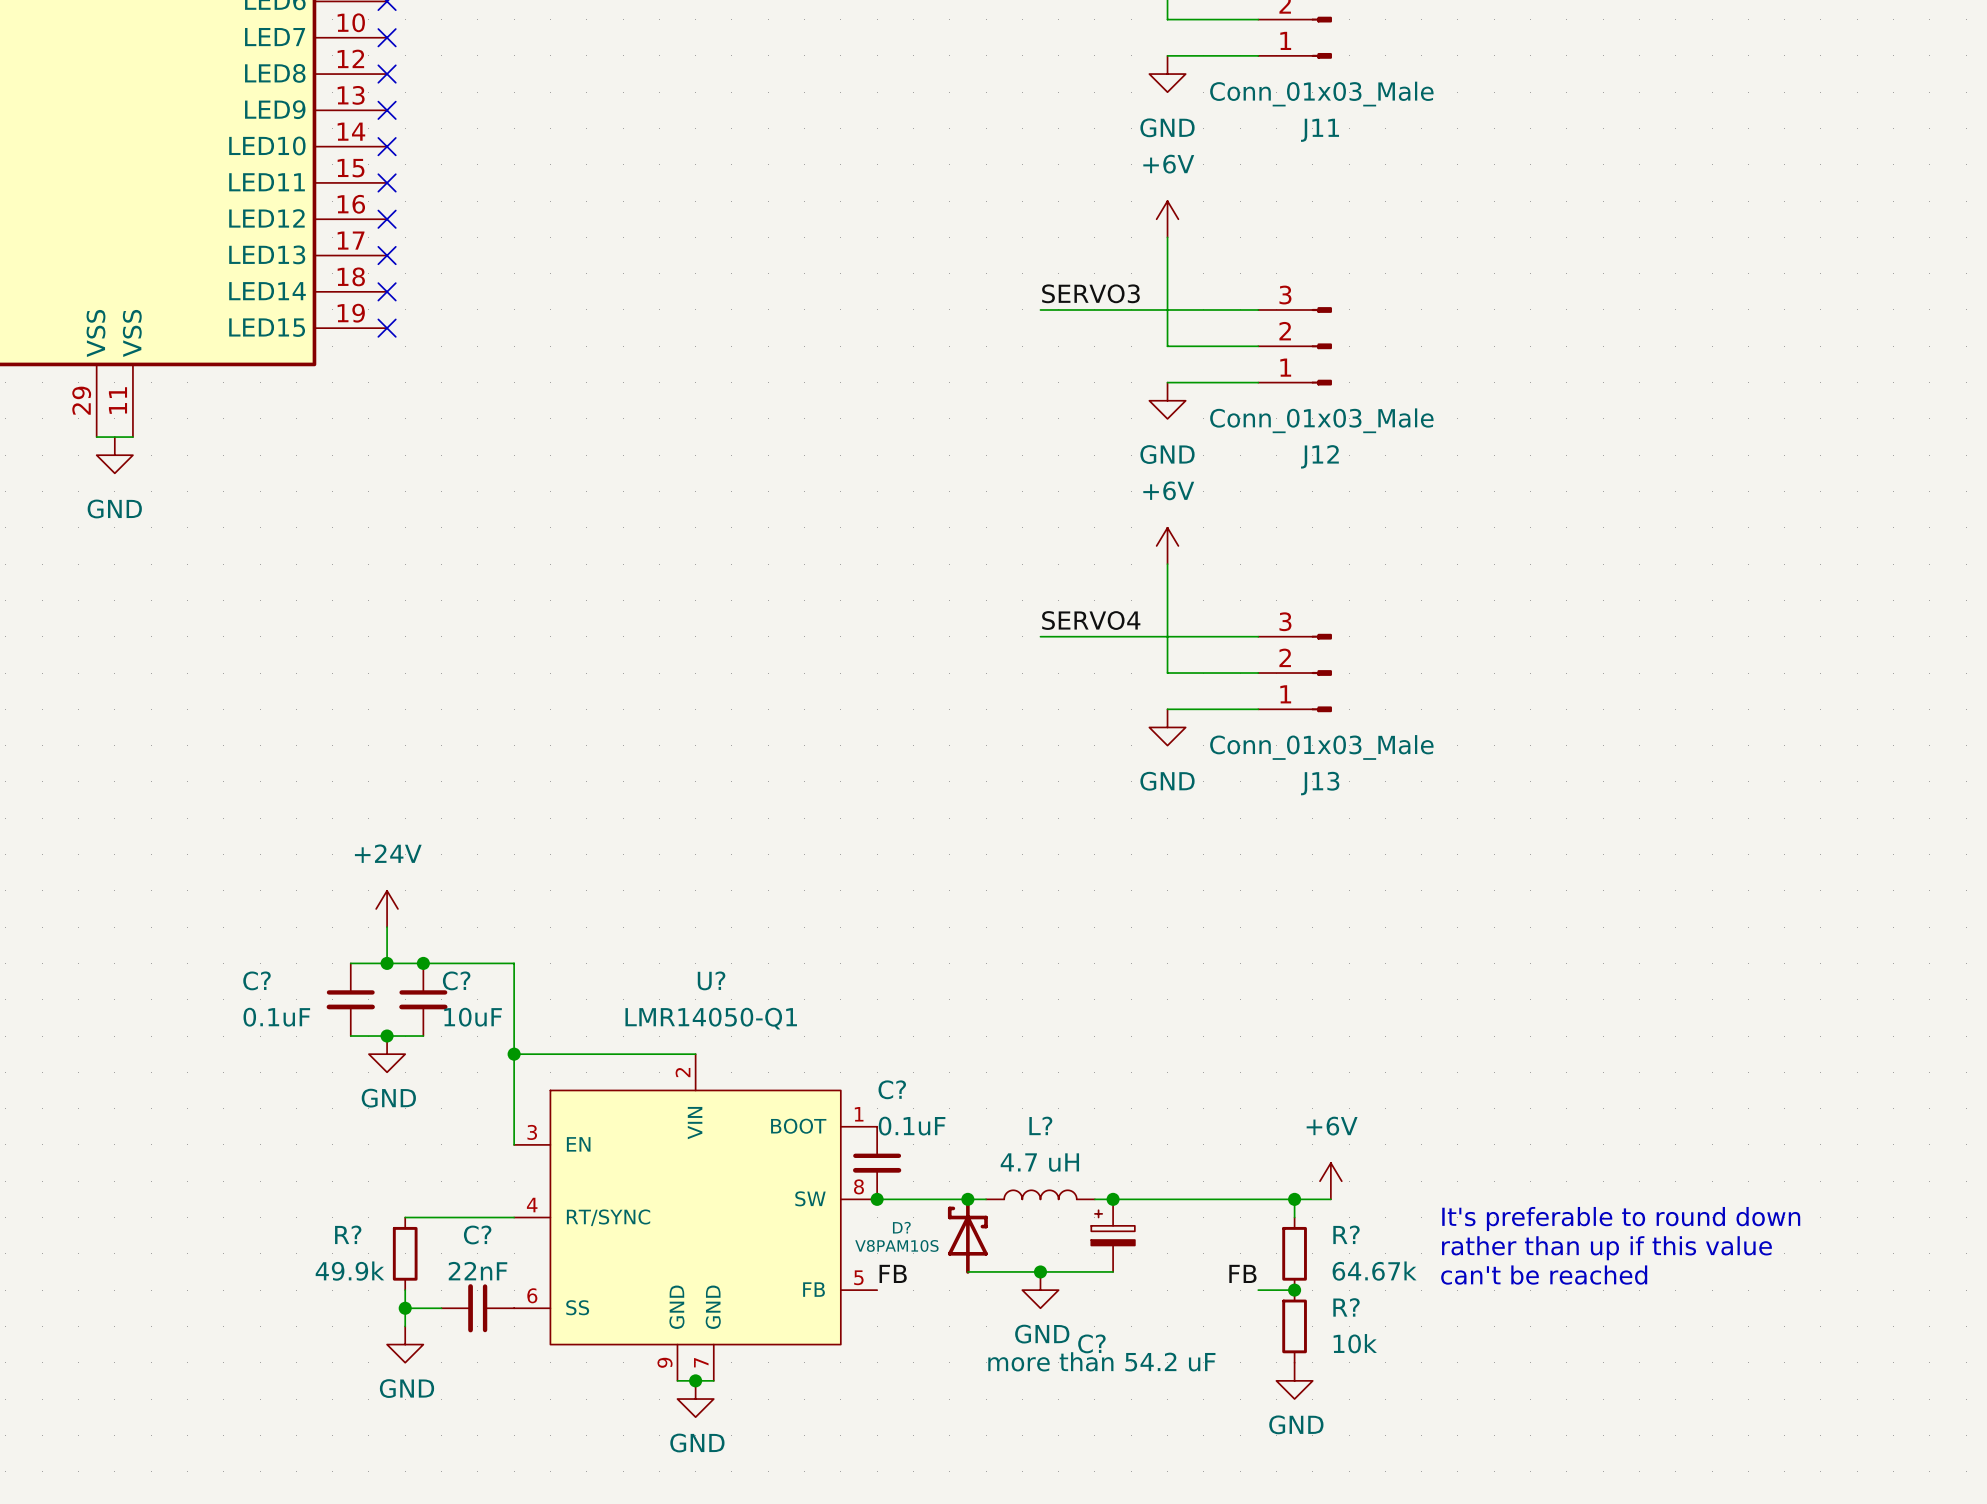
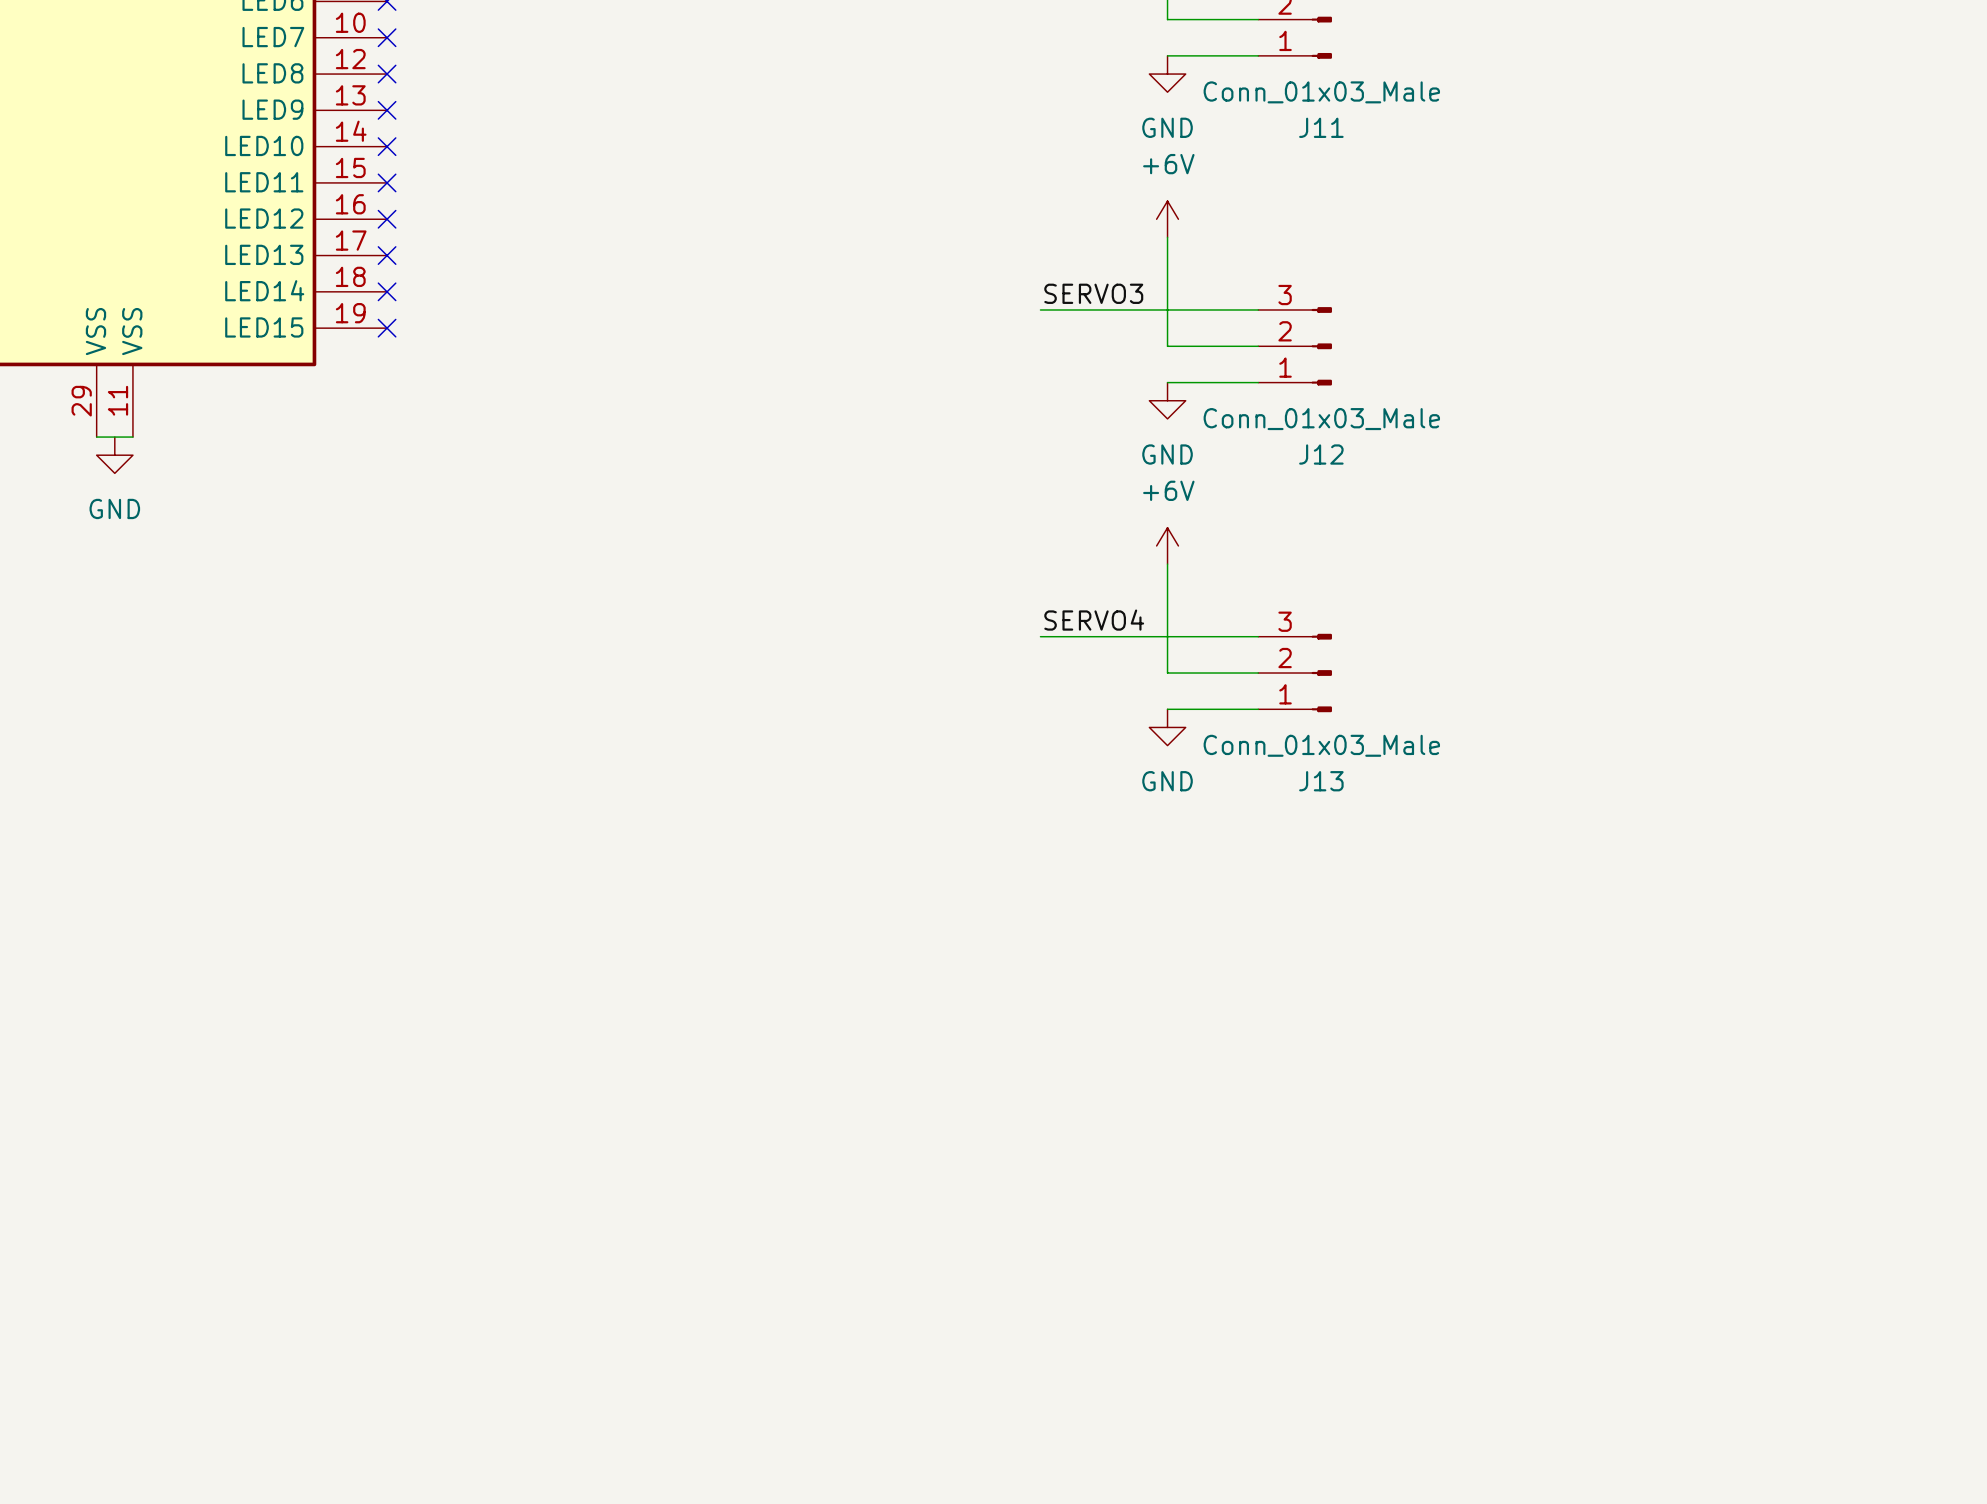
power symbol: +24V (387, 908) -> none
wire: (387, 927) (387, 963) -> none
wire: (350, 963) (514, 963) (514, 1144) -> none
junction: (387, 963) -> none
junction: (423, 963) -> none
C?: 0.1uF (350, 999) -> none
C?: 10uF (423, 999) -> none
wire: (350, 1036) (423, 1036) -> none
junction: (387, 1036) -> none
power symbol: GND (387, 1054) -> none
wire: (514, 1054) (695, 1054) -> none
junction: (514, 1054) -> none
C?: 0.1uF (877, 1163) -> none
power symbol: +6V (1330, 1181) -> none
L?: 4.7 uH (1040, 1194) -> none
wire: (877, 1199) (986, 1199) -> none
junction: (877, 1199) -> none
junction: (967, 1199) -> none
wire: (1094, 1199) (1330, 1199) -> none
junction: (1113, 1199) -> none
wire: (1294, 1199) (1294, 1217) -> none
junction: (1294, 1199) -> none
wire: (405, 1217) (514, 1217) -> none
U?: LMR14050-Q1 (695, 1217) -> none
text: It's preferable to round down (1621, 1219) -> none
D?: V8PAM10S (967, 1235) -> none
C?: more than 54.2 uF (1113, 1235) -> none
text: rather than up if this value (1606, 1248) -> none
R?: 49.9k (405, 1253) -> none
R?: 64.67k (1294, 1253) -> none
wire: (967, 1271) (1113, 1271) -> none
junction: (1040, 1271) -> none
label: FB (893, 1273) -> none
label: FB (1242, 1273) -> none
text: can't be reached (1544, 1275) -> none
wire: (405, 1290) (405, 1326) -> none
power symbol: GND (1040, 1290) -> none
wire: (1258, 1290) (1294, 1290) -> none
junction: (1294, 1290) -> none
wire: (405, 1308) (441, 1308) -> none
junction: (405, 1308) -> none
C?: 22nF (477, 1308) -> none
R?: 10k (1294, 1326) -> none
power symbol: GND (405, 1344) -> none
wire: (677, 1380) (713, 1380) -> none
junction: (695, 1380) -> none
power symbol: GND (1294, 1380) -> none
power symbol: GND (695, 1399) -> none

